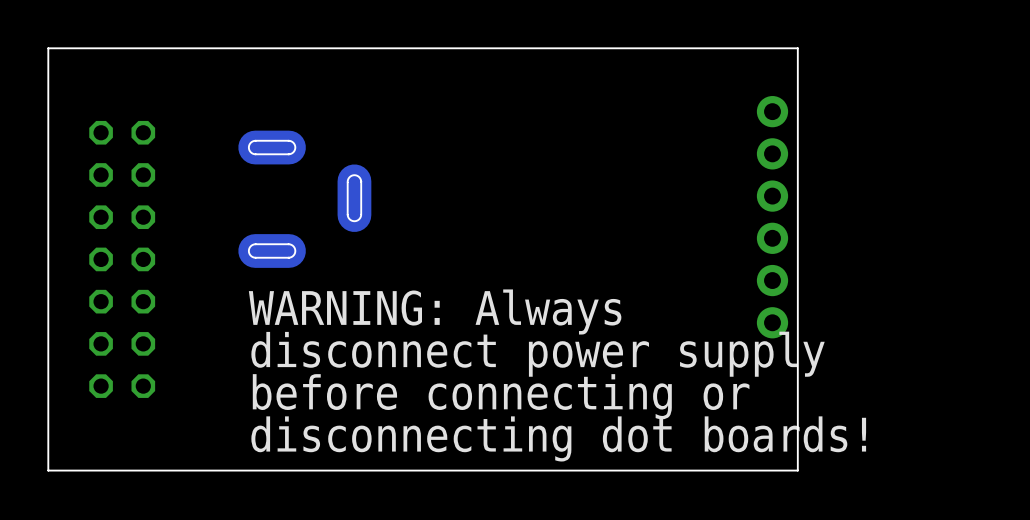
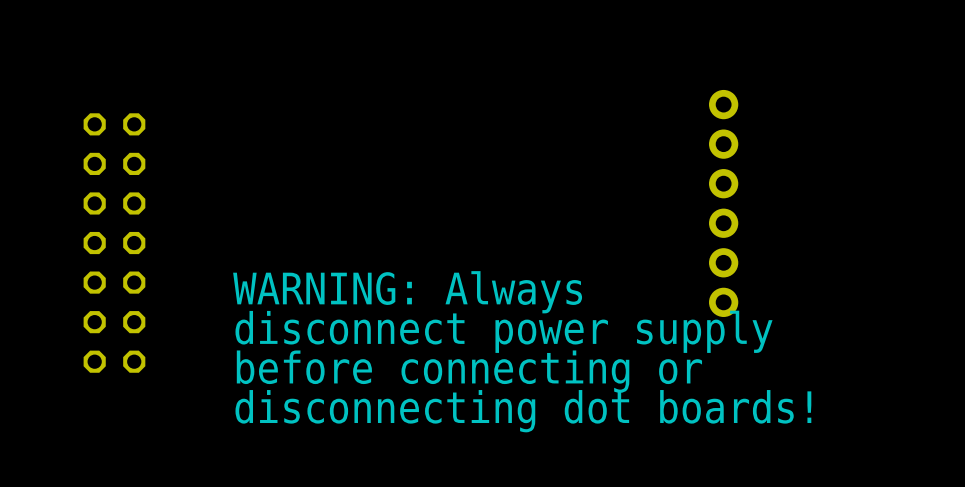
board edge: (797, 48) (797, 470) (48, 470) (48, 48) (797, 48) -> none
part: (304, 199) -> none

